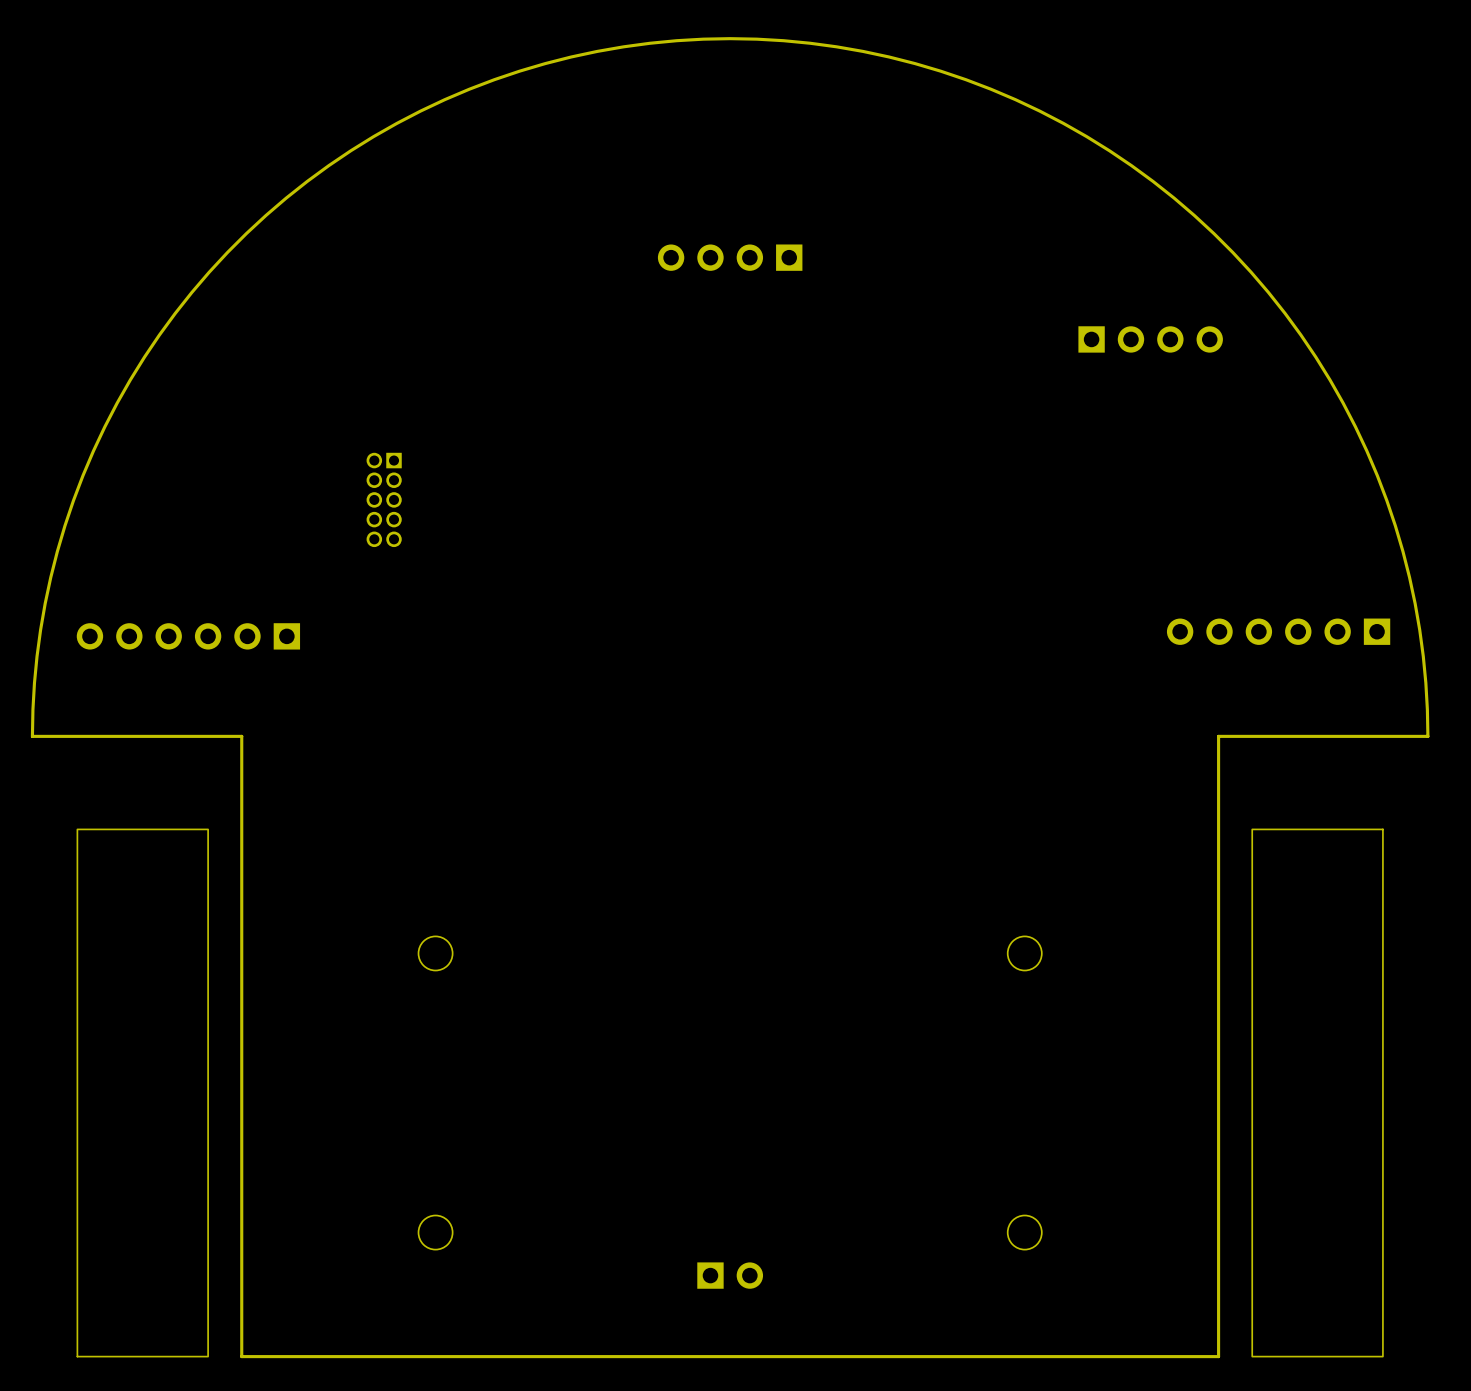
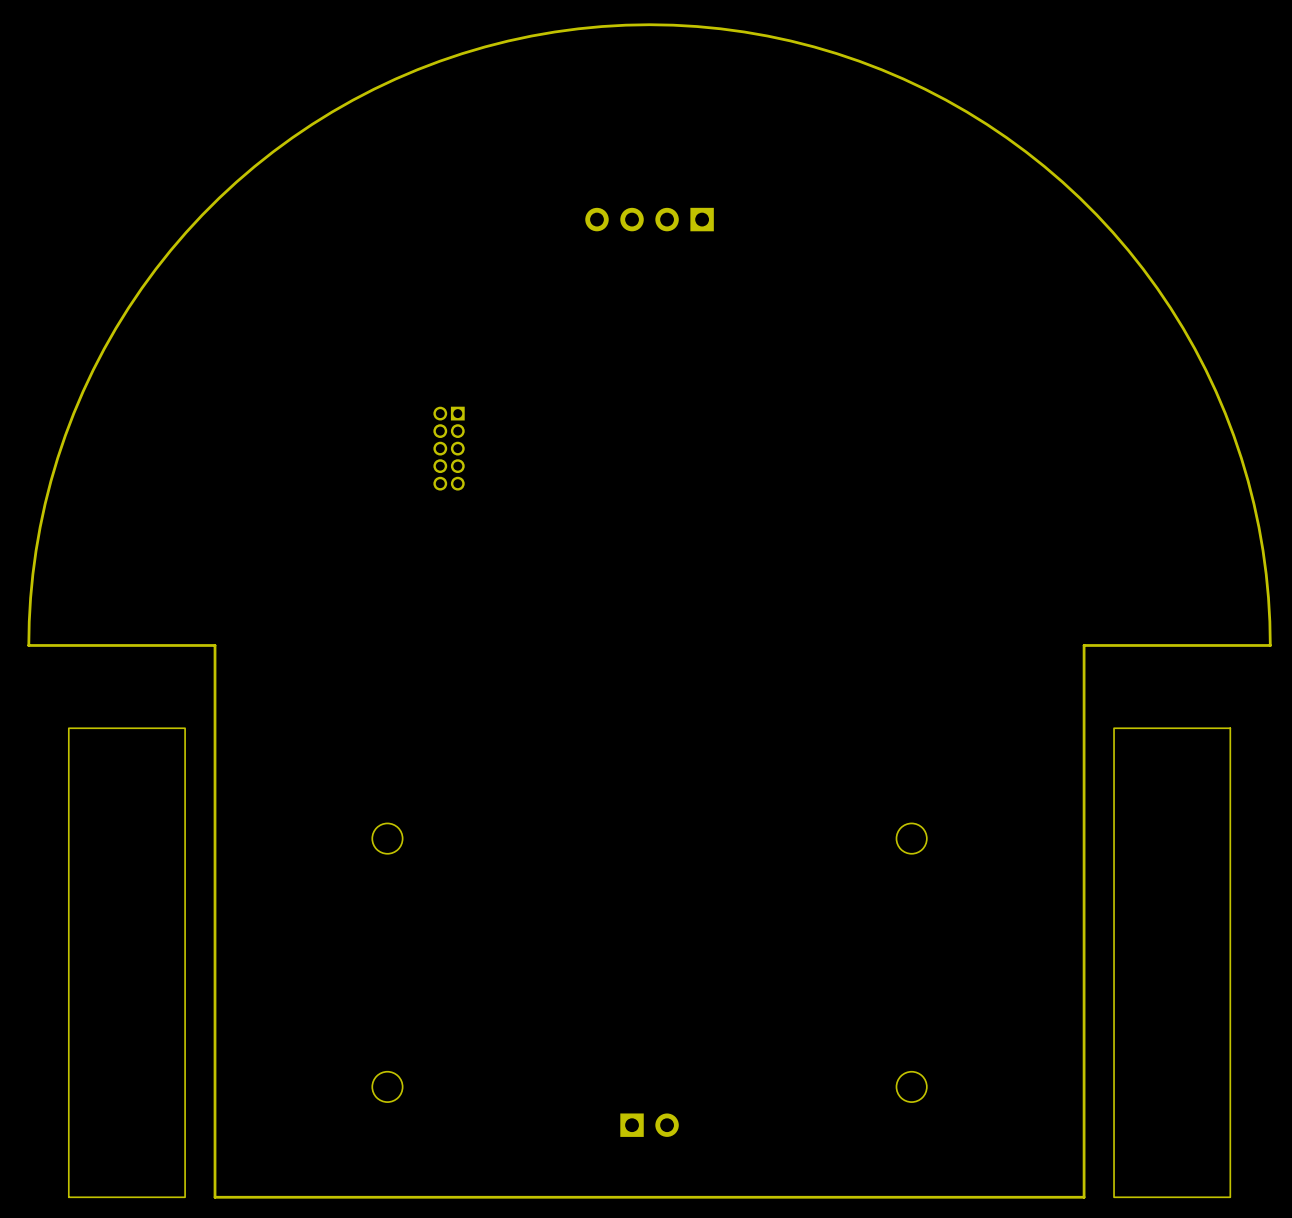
part: (1150, 339) -> none
part position: (384, 499) -> (449, 448)
part: (1278, 631) -> none
part: (188, 636) -> none

